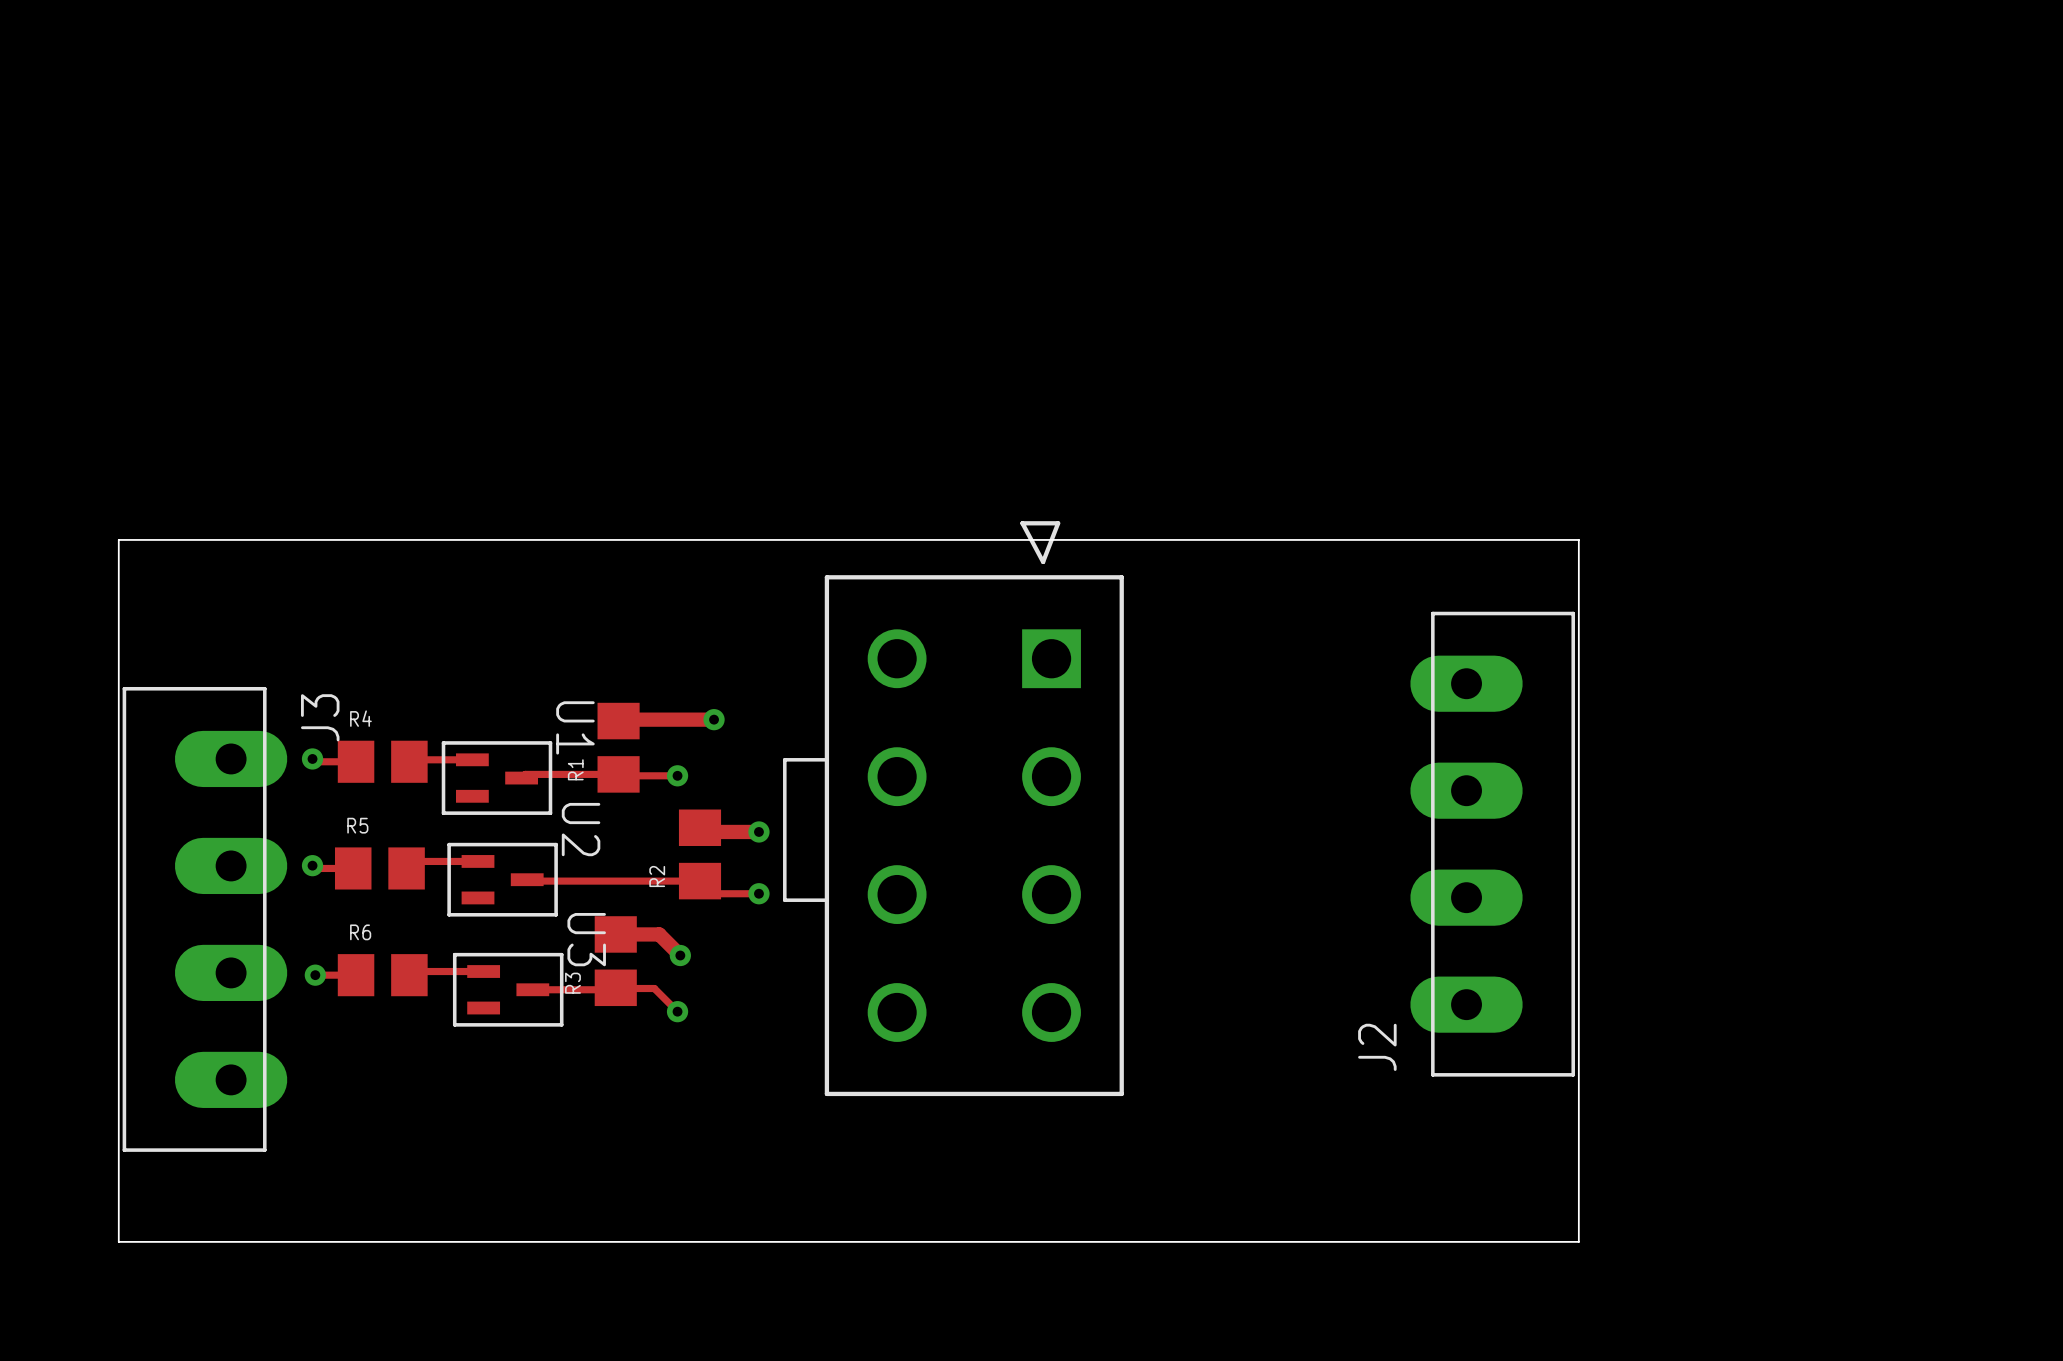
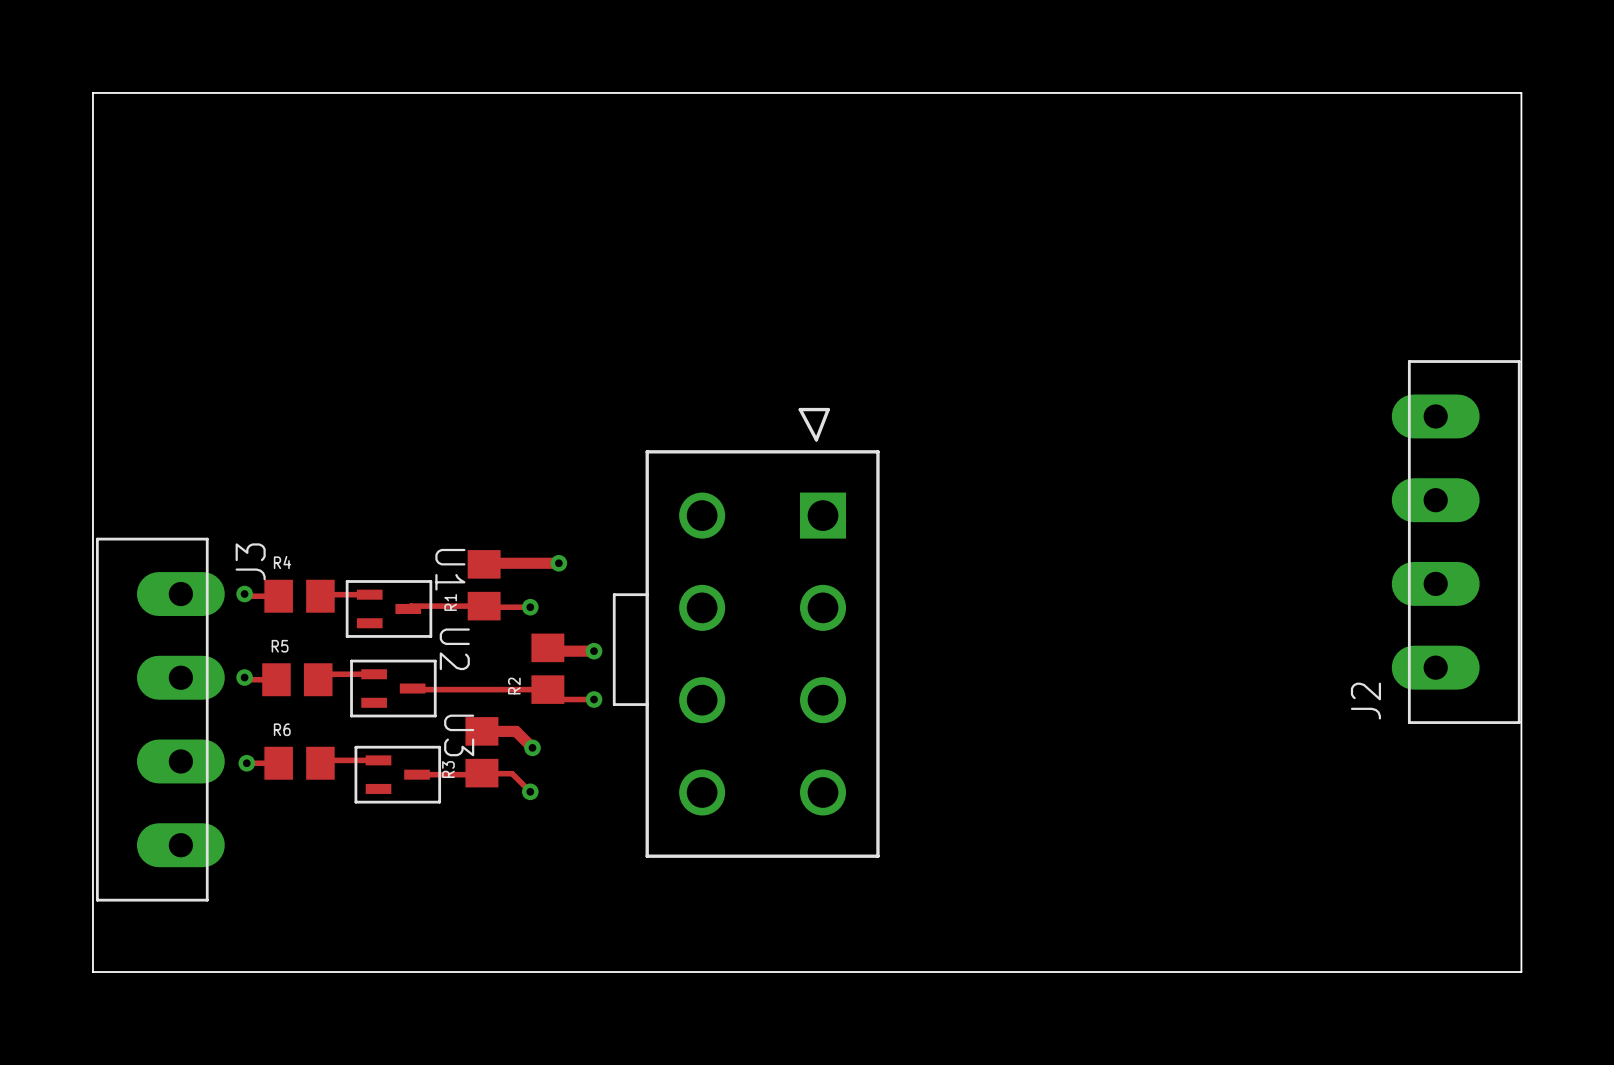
board edge: (118, 539) (1578, 539) (1578, 1241) -> (92, 422) (92, 92) (1521, 92) (1521, 972) (1235, 972)
J2 position: (1492, 844) -> (1456, 542)

